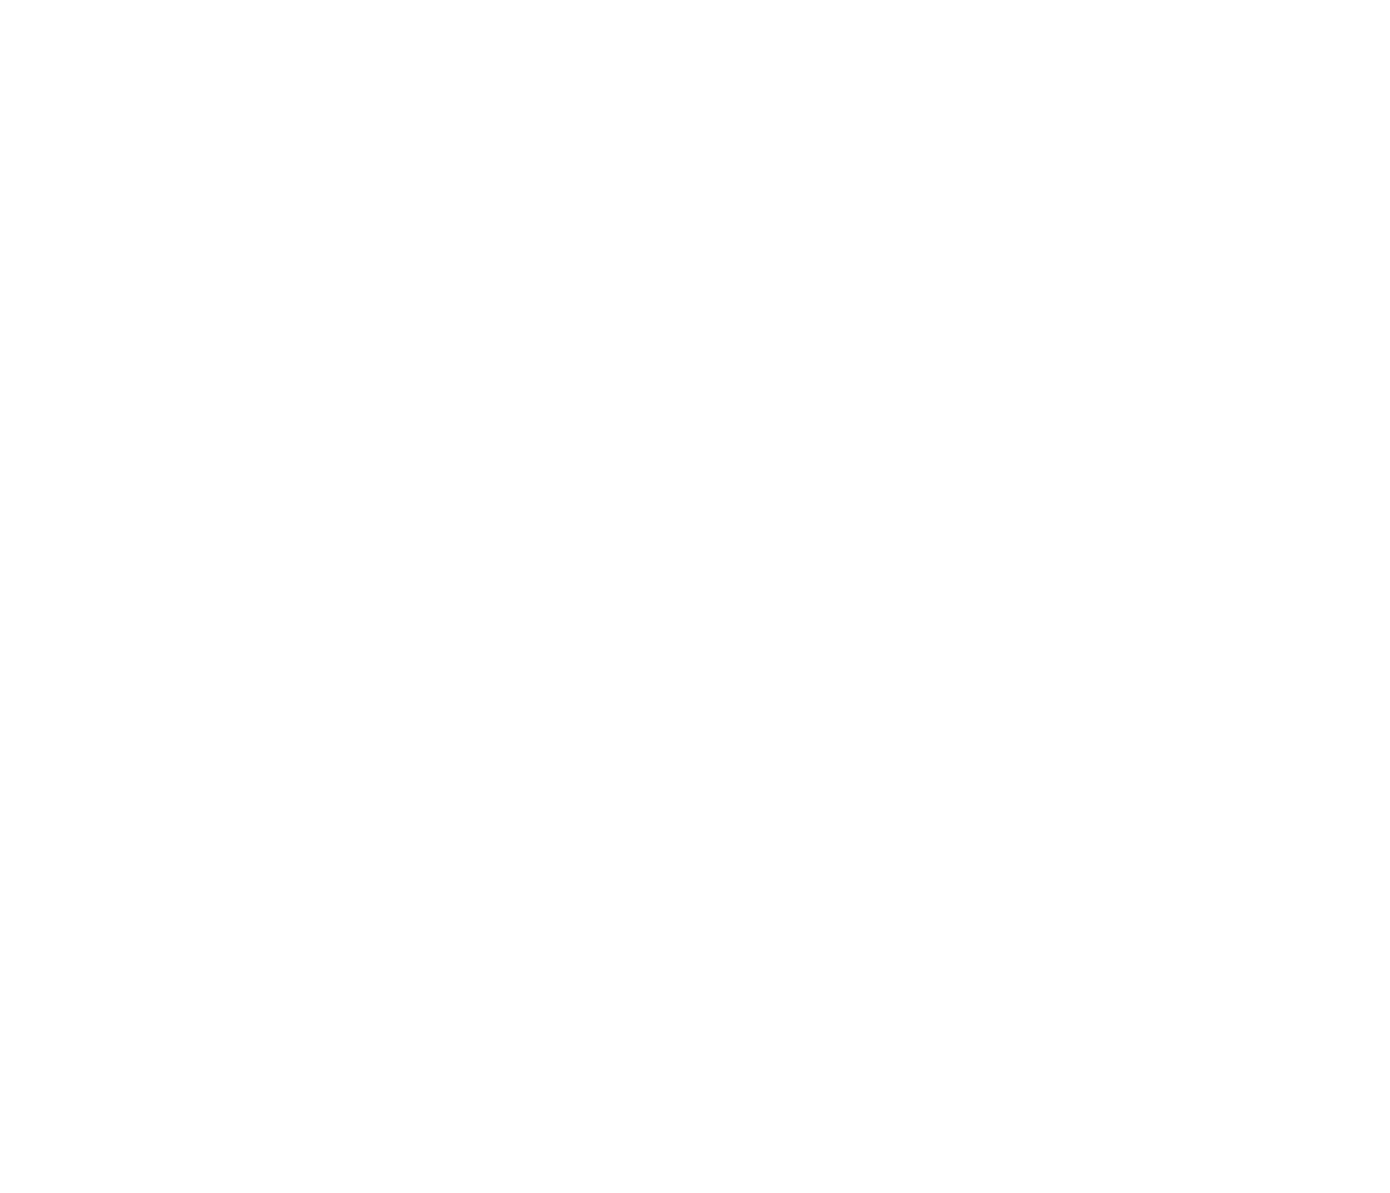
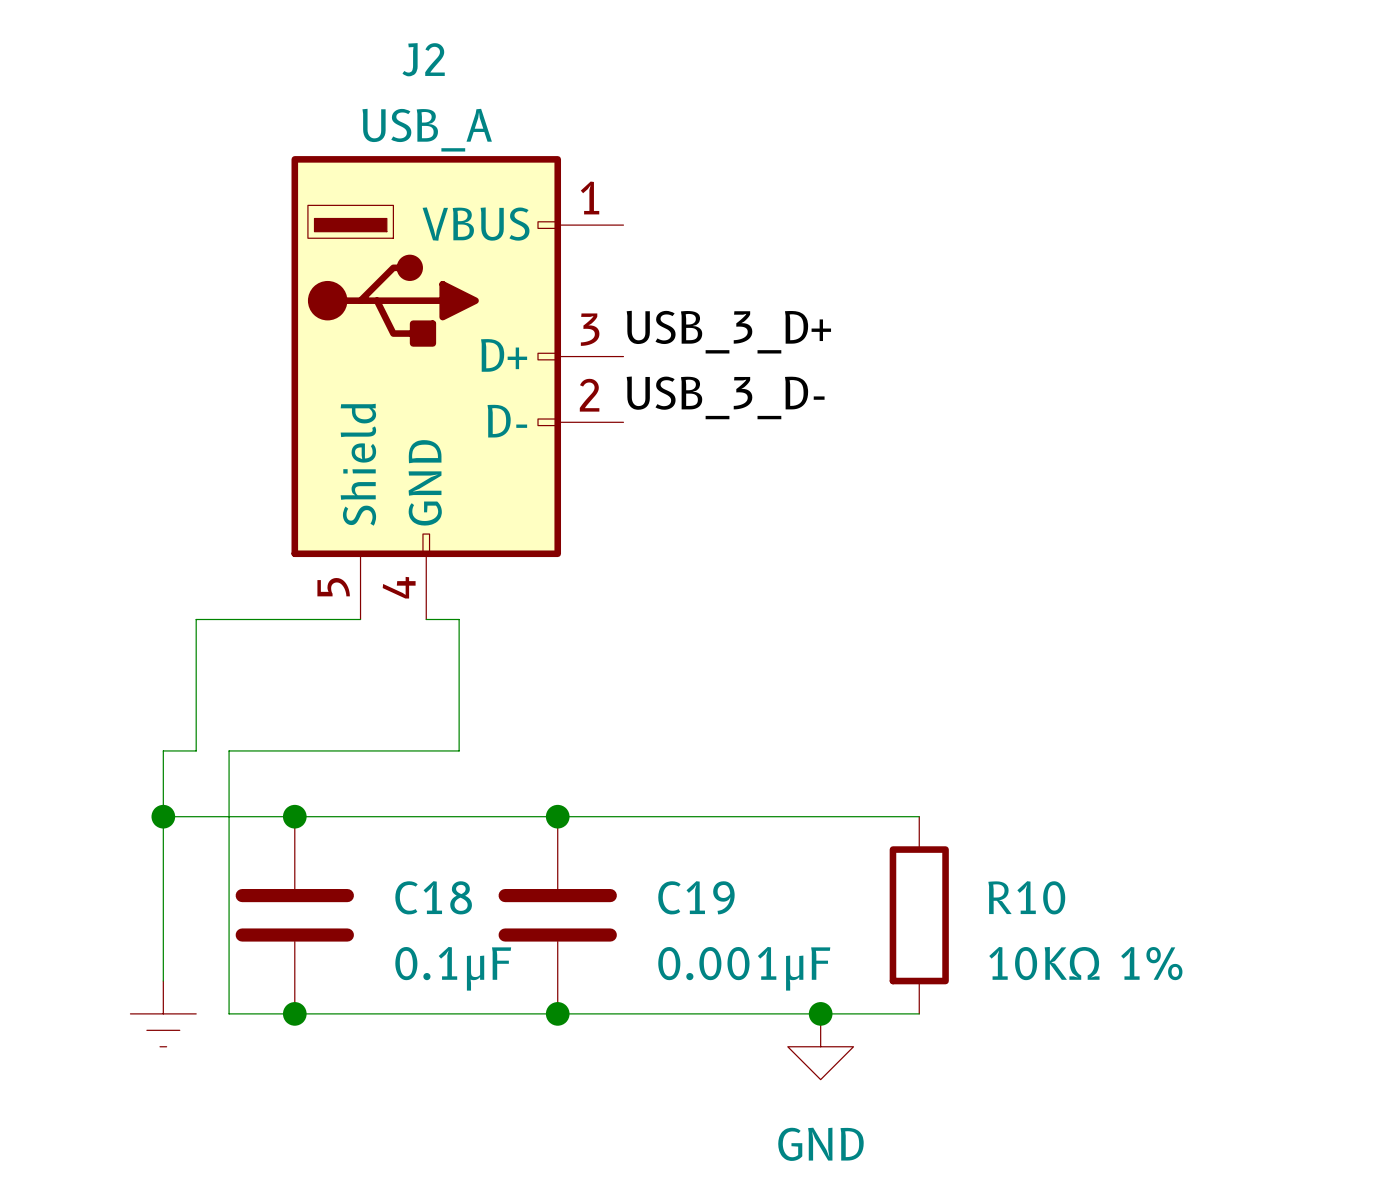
label: none -> USB_3_D+ (728, 332)
J2: none -> USB_A (457, 387)
label: none -> USB_3_D- (725, 397)
wire: none -> (360, 619) (196, 619) (196, 750) (163, 750) (163, 981)
wire: none -> (426, 619) (459, 619) (459, 750) (229, 750) (229, 1013) (919, 1013)
wire: none -> (163, 816) (919, 816)
junction: none -> (163, 816)
junction: none -> (294, 816)
junction: none -> (557, 816)
C18: none -> 0.1μF (294, 915)
C19: none -> 0.001μF (557, 915)
R10: none -> 10KΩ 1% (919, 915)
power symbol: none -> (163, 1013)
junction: none -> (294, 1013)
junction: none -> (557, 1013)
junction: none -> (820, 1013)
power symbol: none -> GND (820, 1046)

